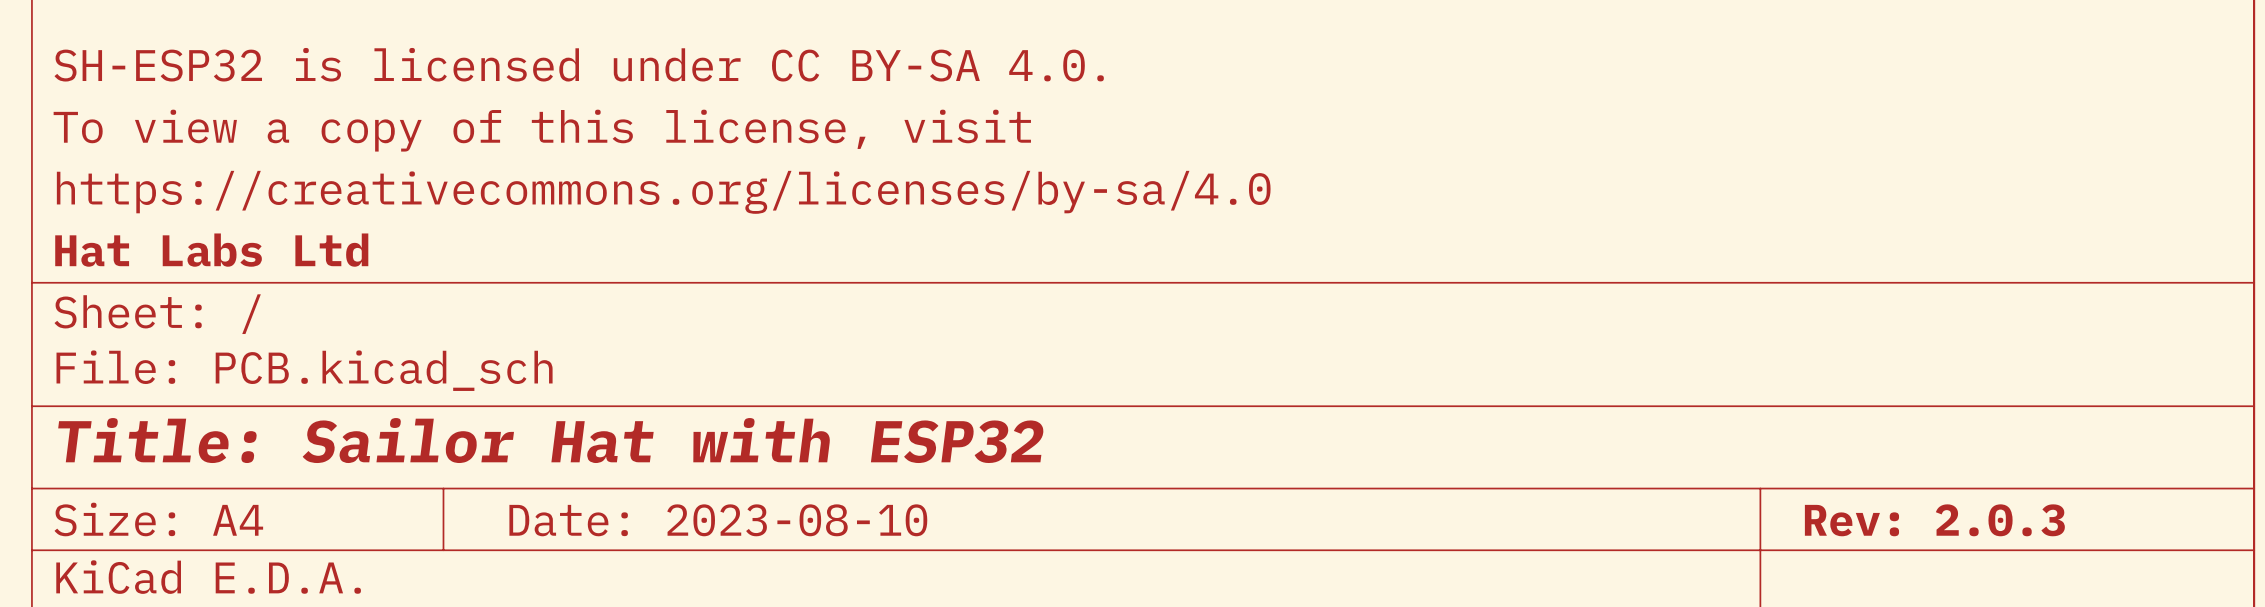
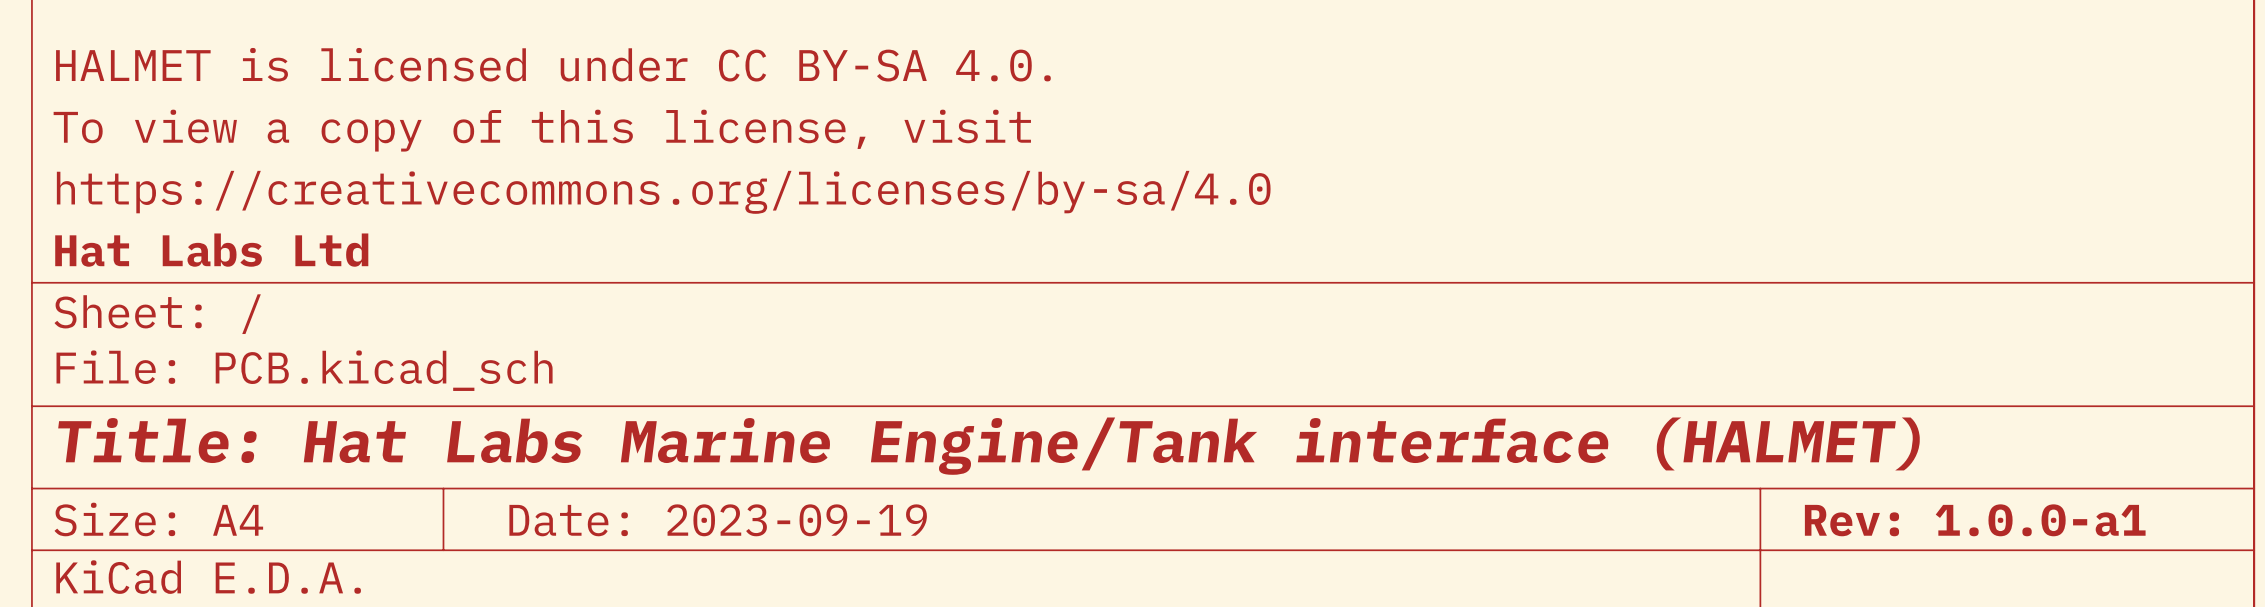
title block: SH-ESP32 is licensed under CC BY-SA 4.0. (579, 64) -> HALMET is licensed under CC BY-SA 4.0. (553, 64)
title block: Title: Sailor Hat with ESP32 (550, 440) -> Title: Hat Labs Marine Engine/Tank interface (HALMET) (989, 446)
title block: Date: 2023-08-10 (718, 520) -> Date: 2023-09-19 (718, 520)
title block: Rev: 2.0.3 (1934, 520) -> Rev: 1.0.0-a1 (1975, 520)

